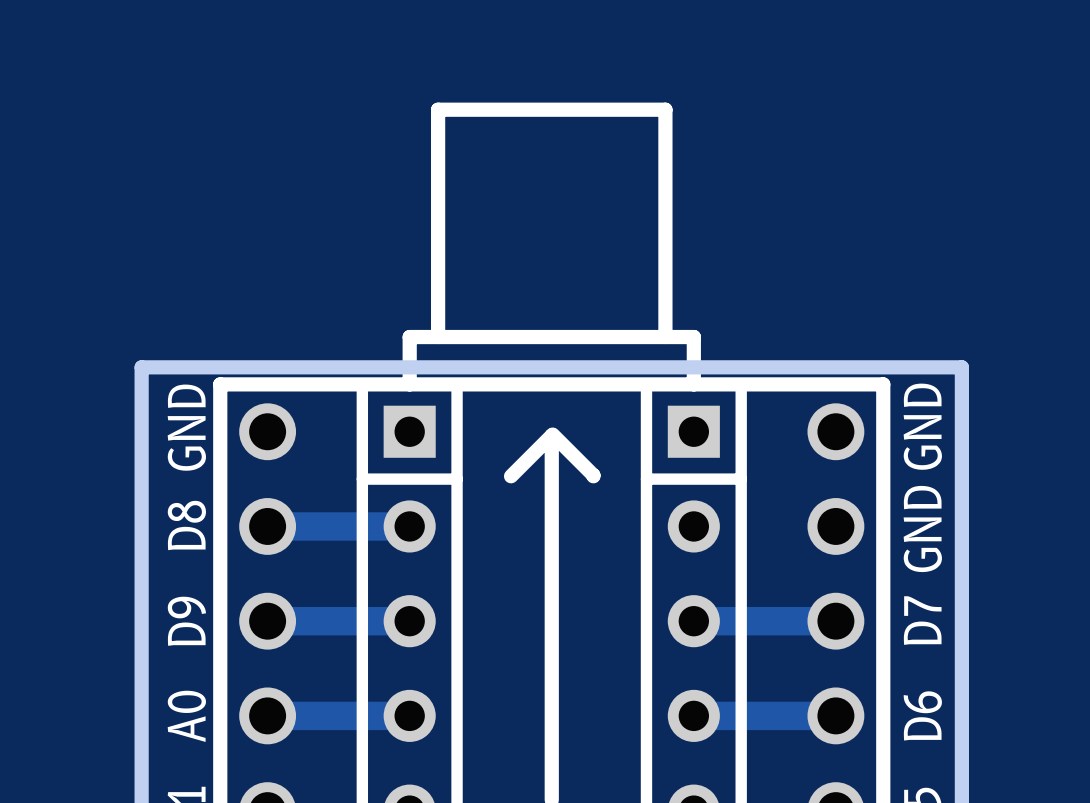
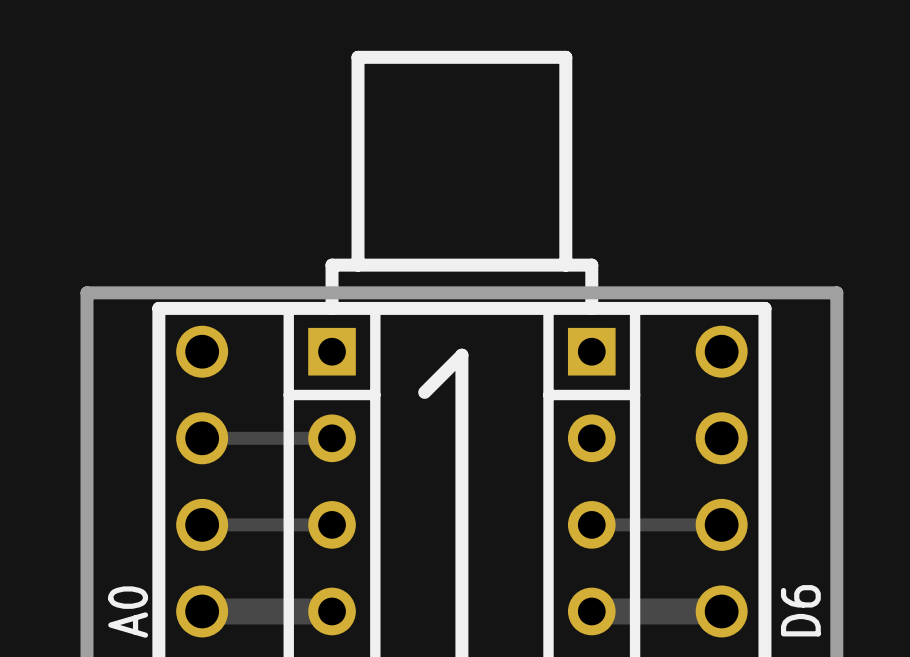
text: GND (922, 426) -> none
text: GND (186, 427) -> none
line: (552, 434) (593, 476) -> none
text: D8 (186, 525) -> none
track width: thick (267, 526) (409, 526) -> thin (202, 438) (332, 438)
text: GND (922, 529) -> none
text: D7 (922, 620) -> none
text: D9 (186, 621) -> none
track width: thick (267, 621) (409, 621) -> thin (202, 524) (332, 524)
track width: thick (693, 621) (835, 621) -> thin (591, 524) (721, 524)

